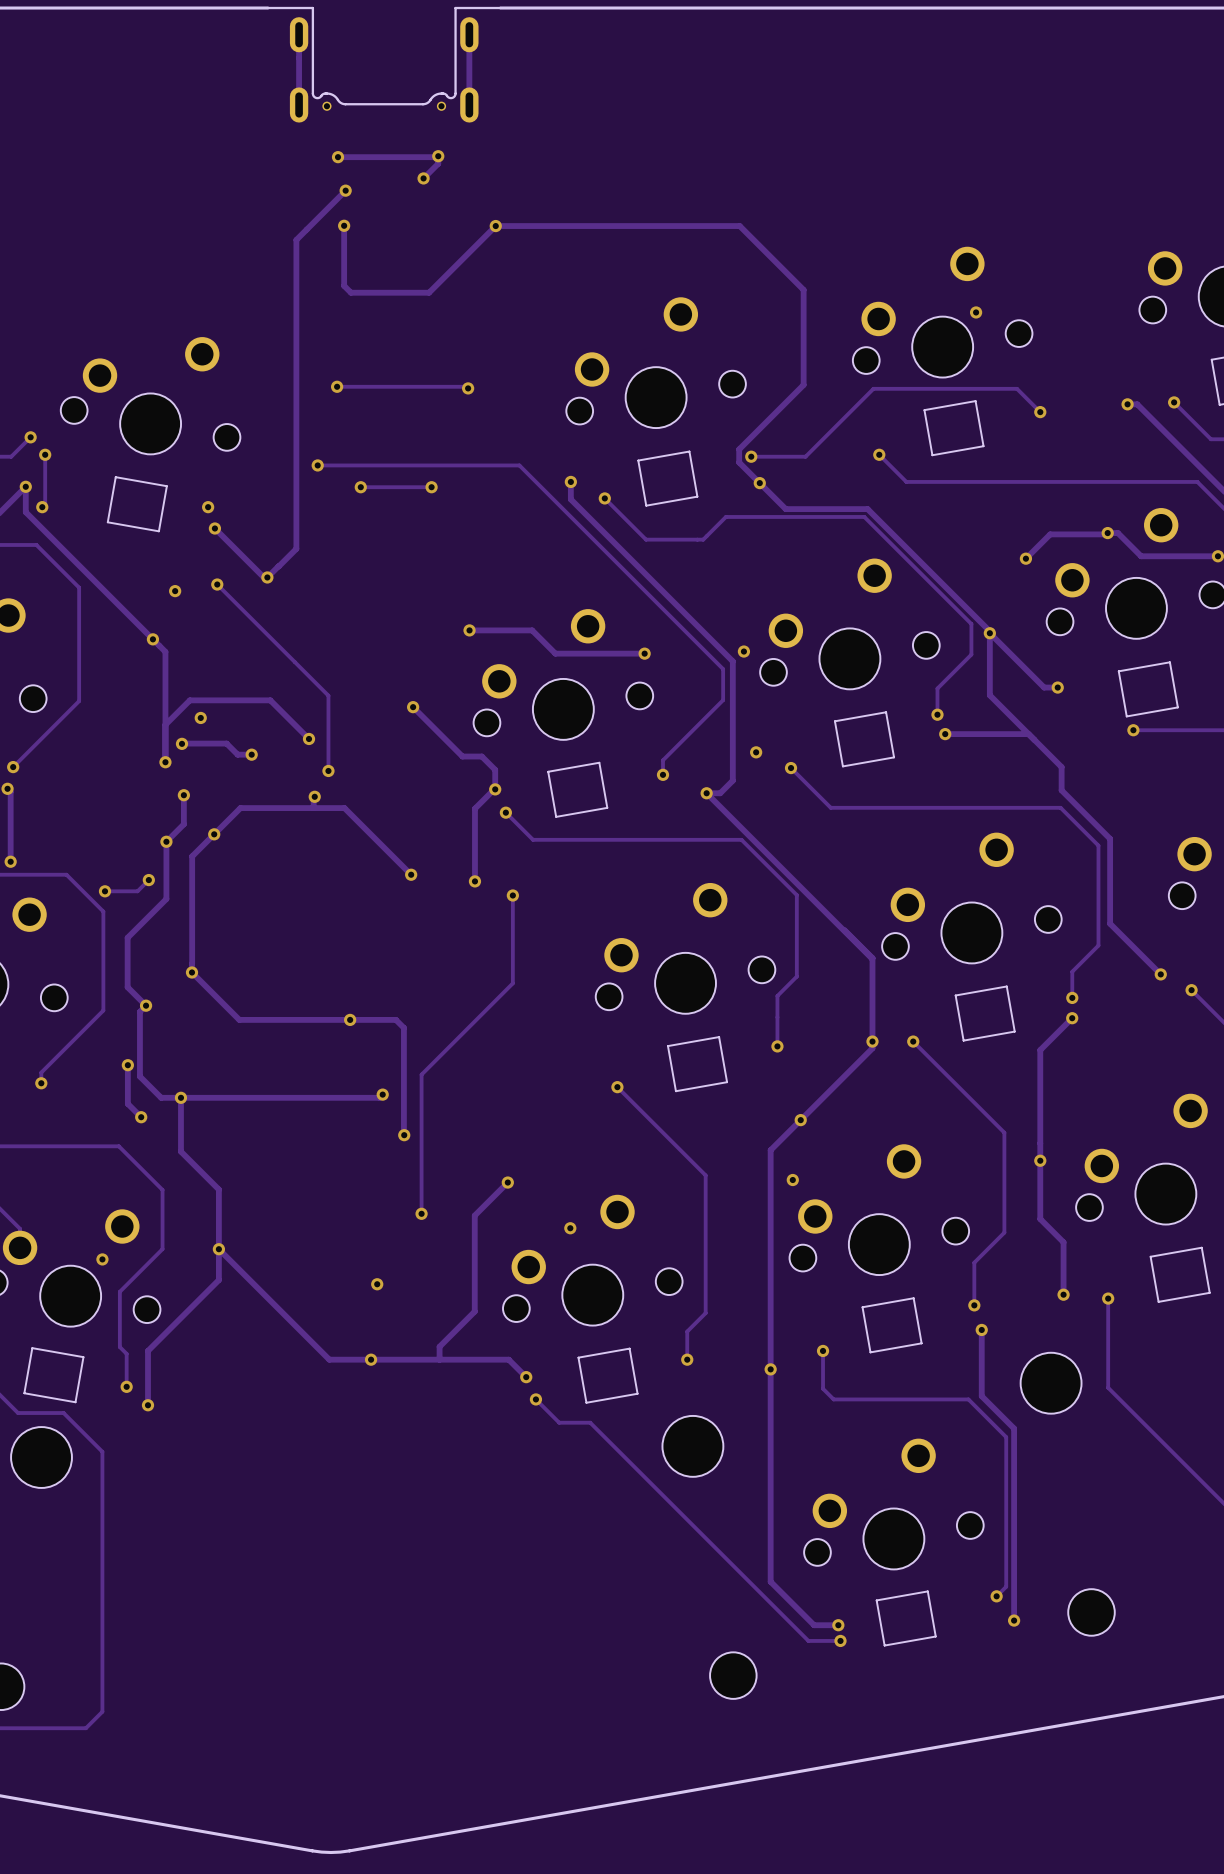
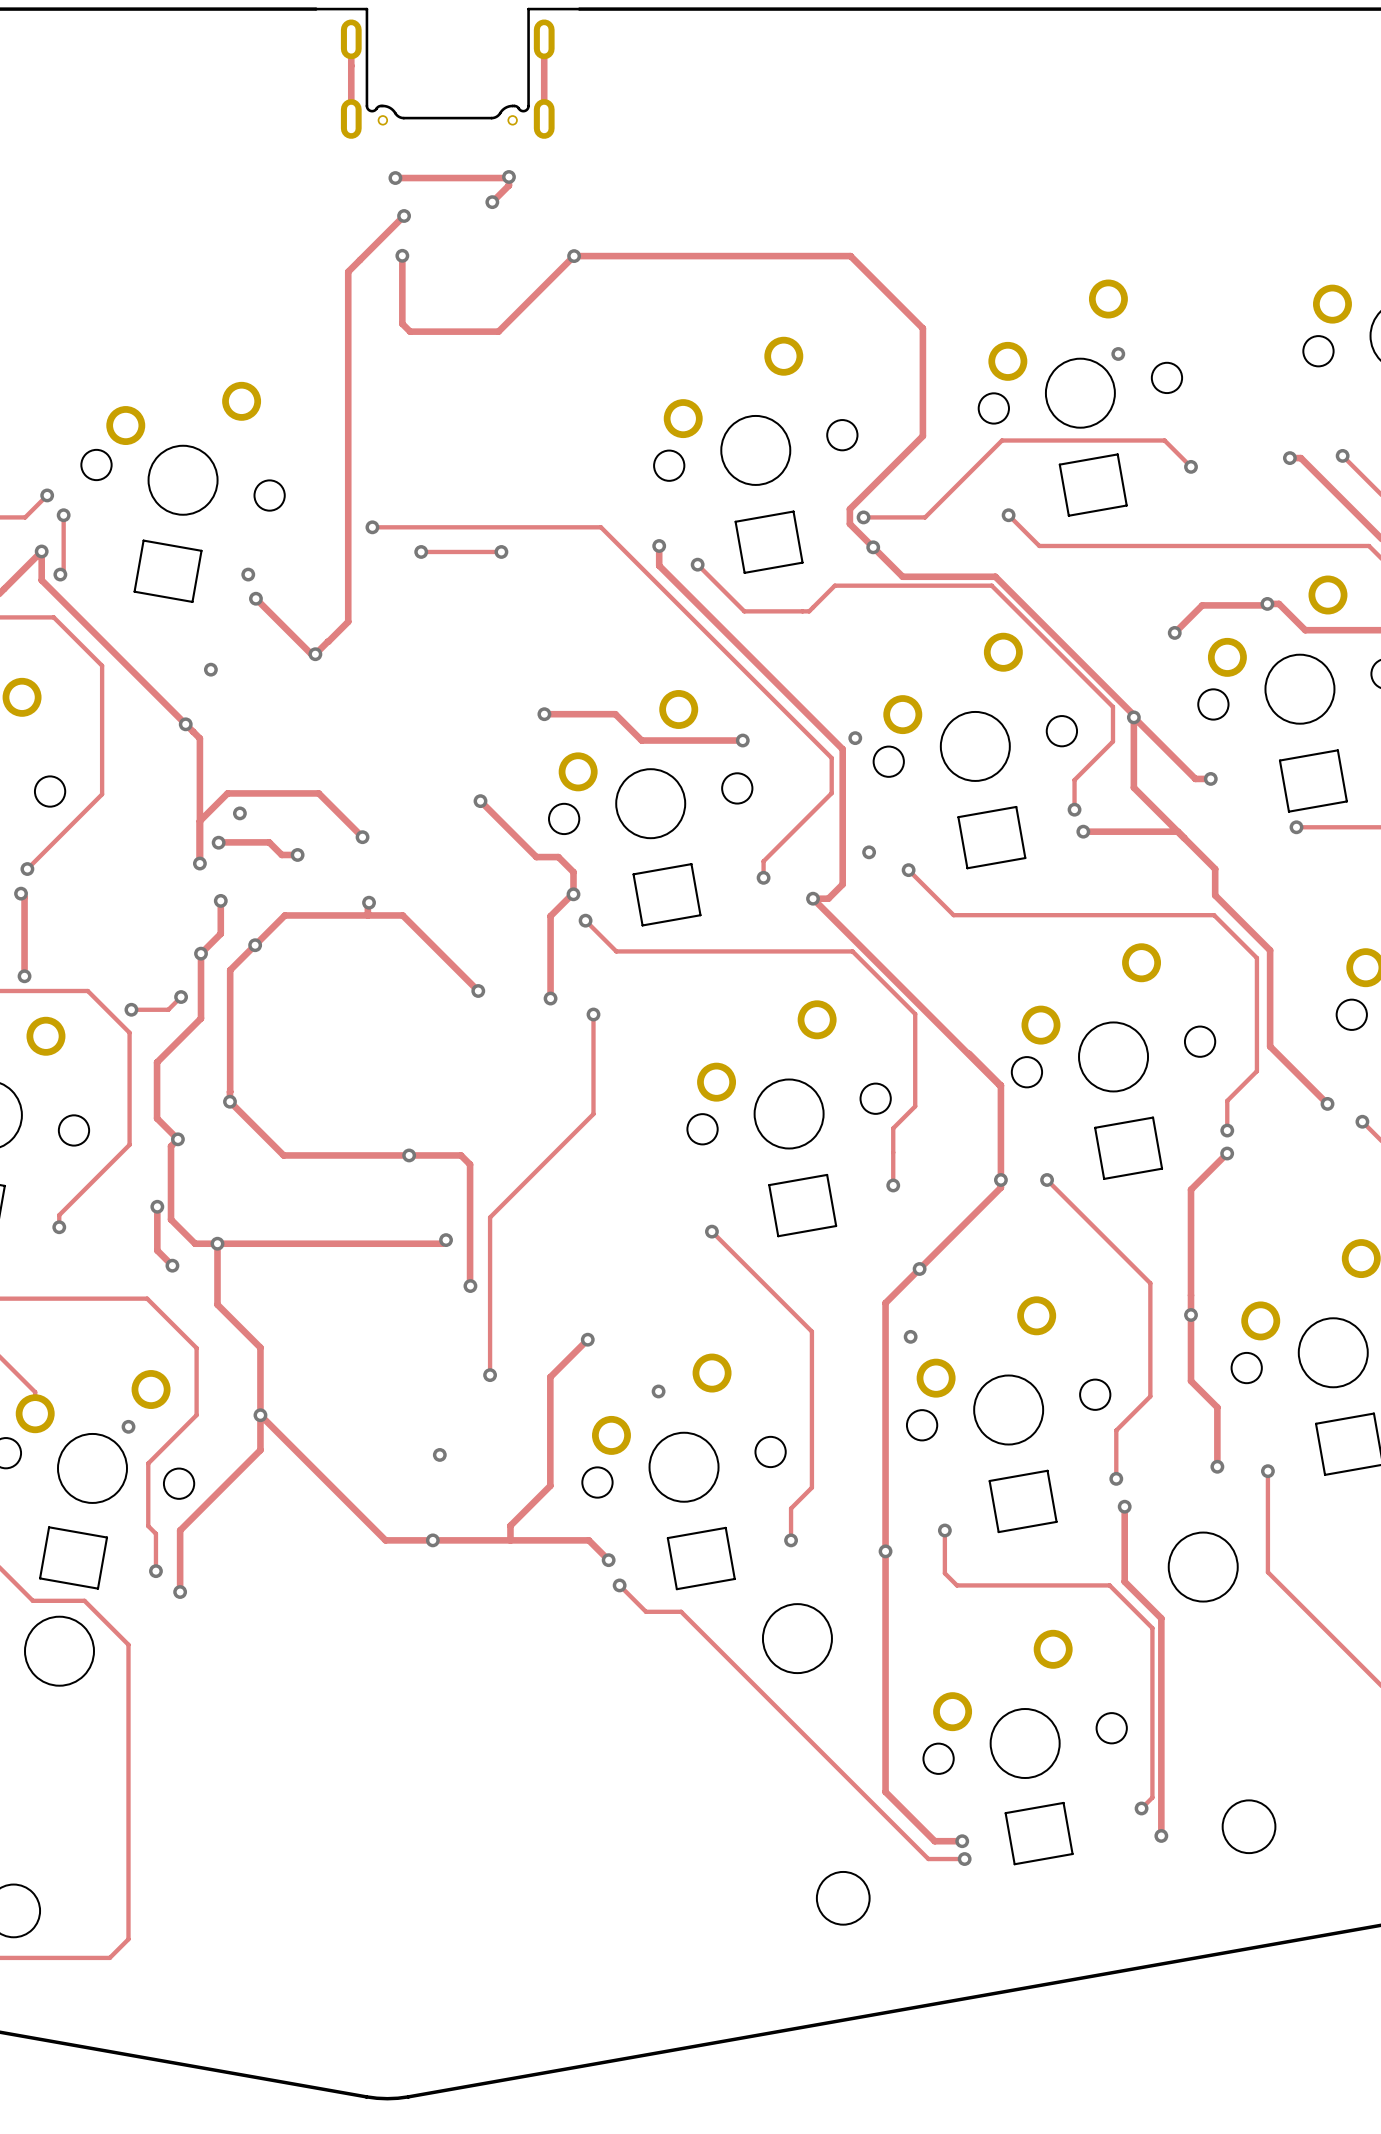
track: (337, 386) (466, 386) (468, 388) -> none
via: (337, 386) -> none
via: (468, 388) -> none
track: (217, 584) (328, 695) (328, 770) -> none
via: (217, 584) -> none
via: (328, 770) -> none

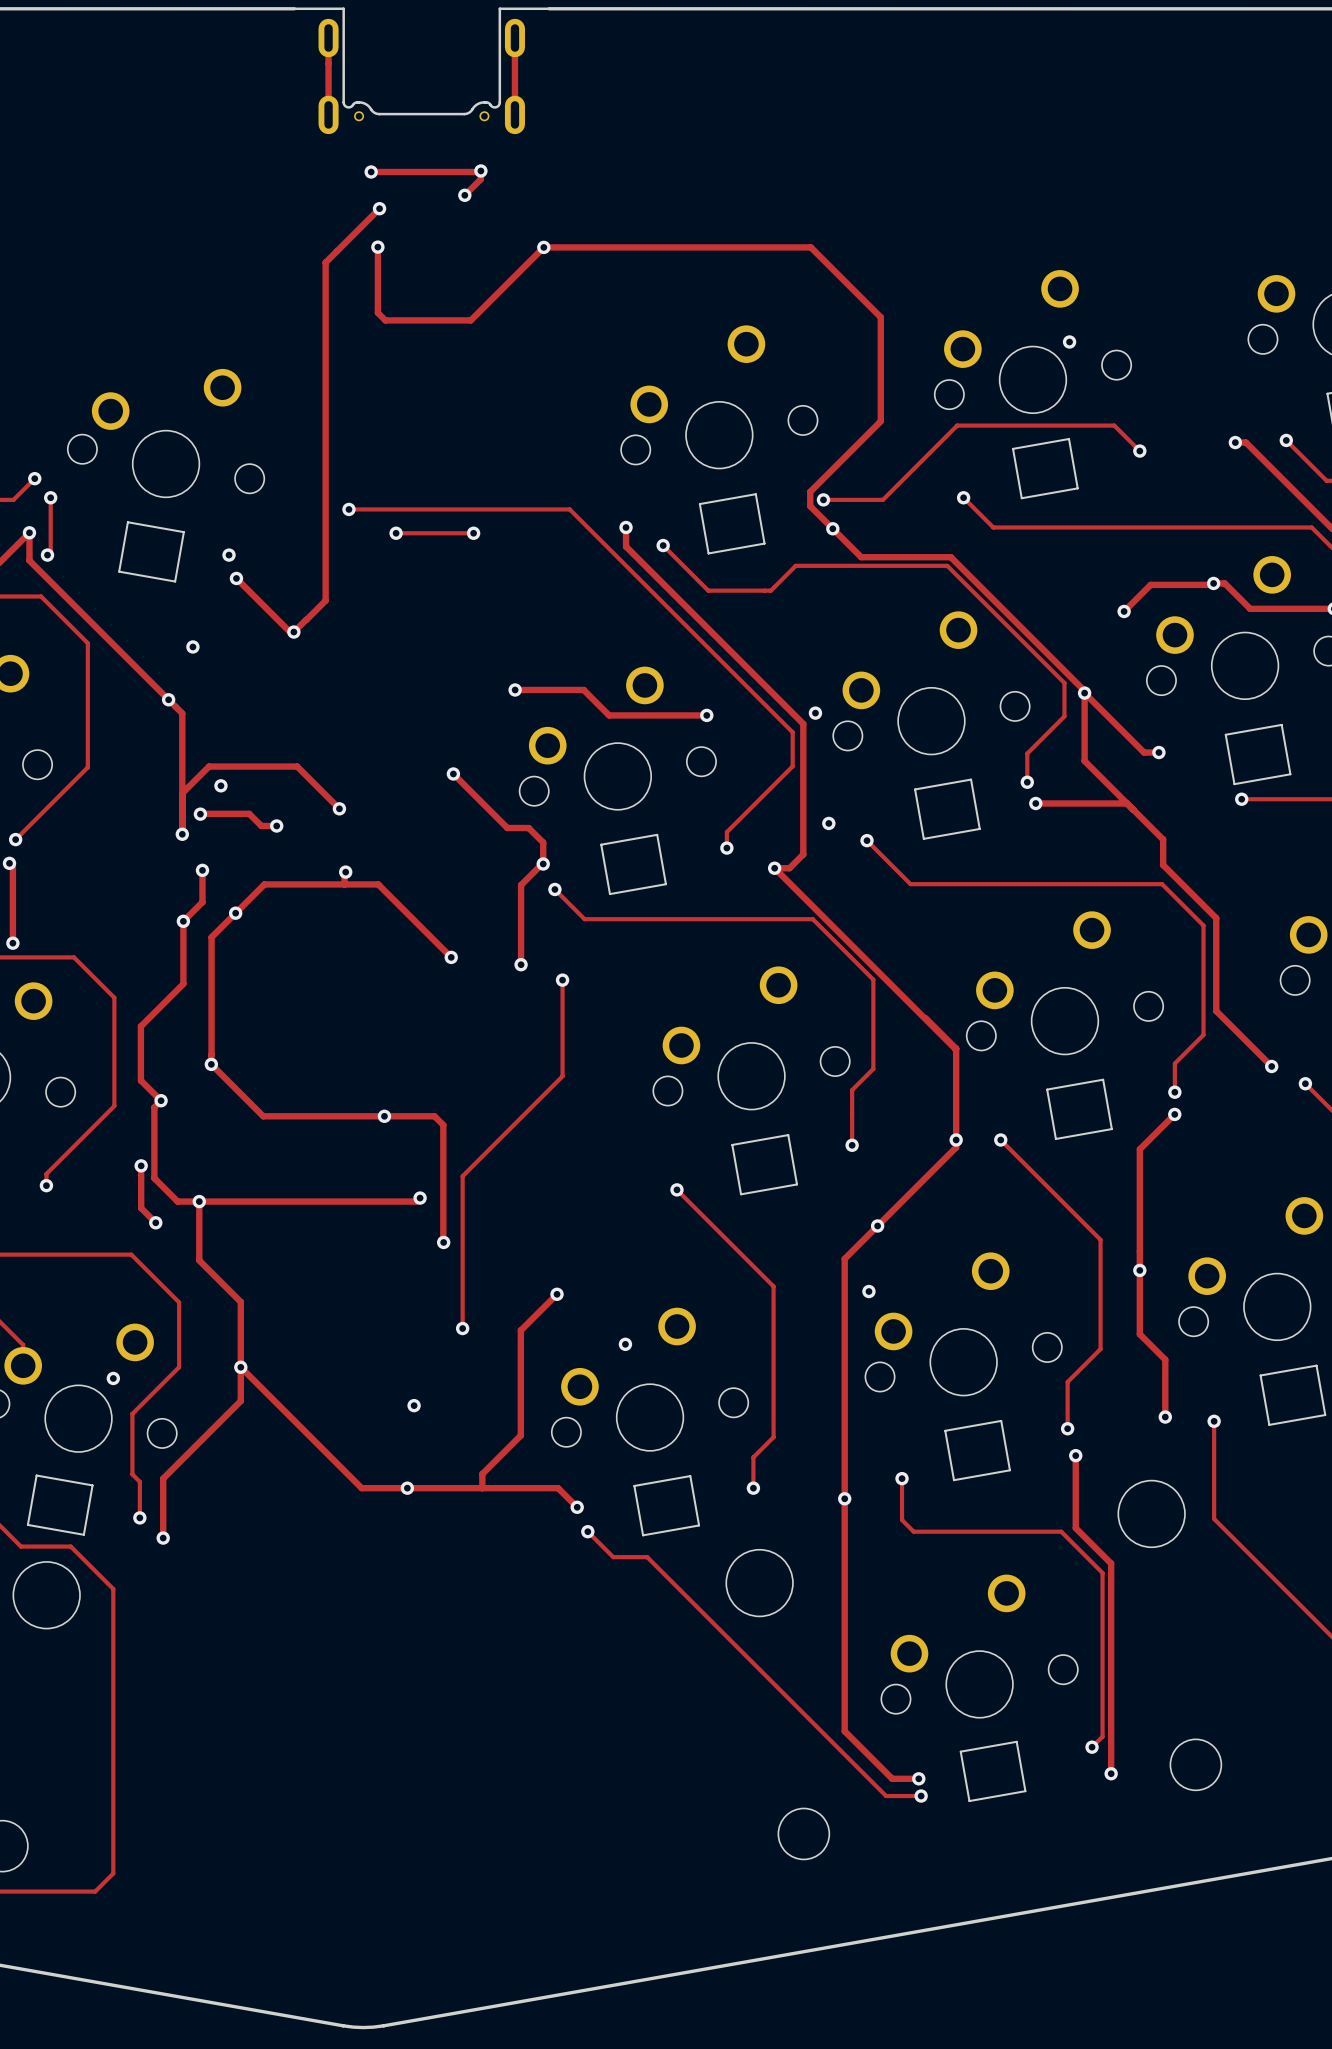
track: (181, 997) (168, 1009) (131, 1009) -> none
via: (181, 997) -> none
via: (131, 1009) -> none

